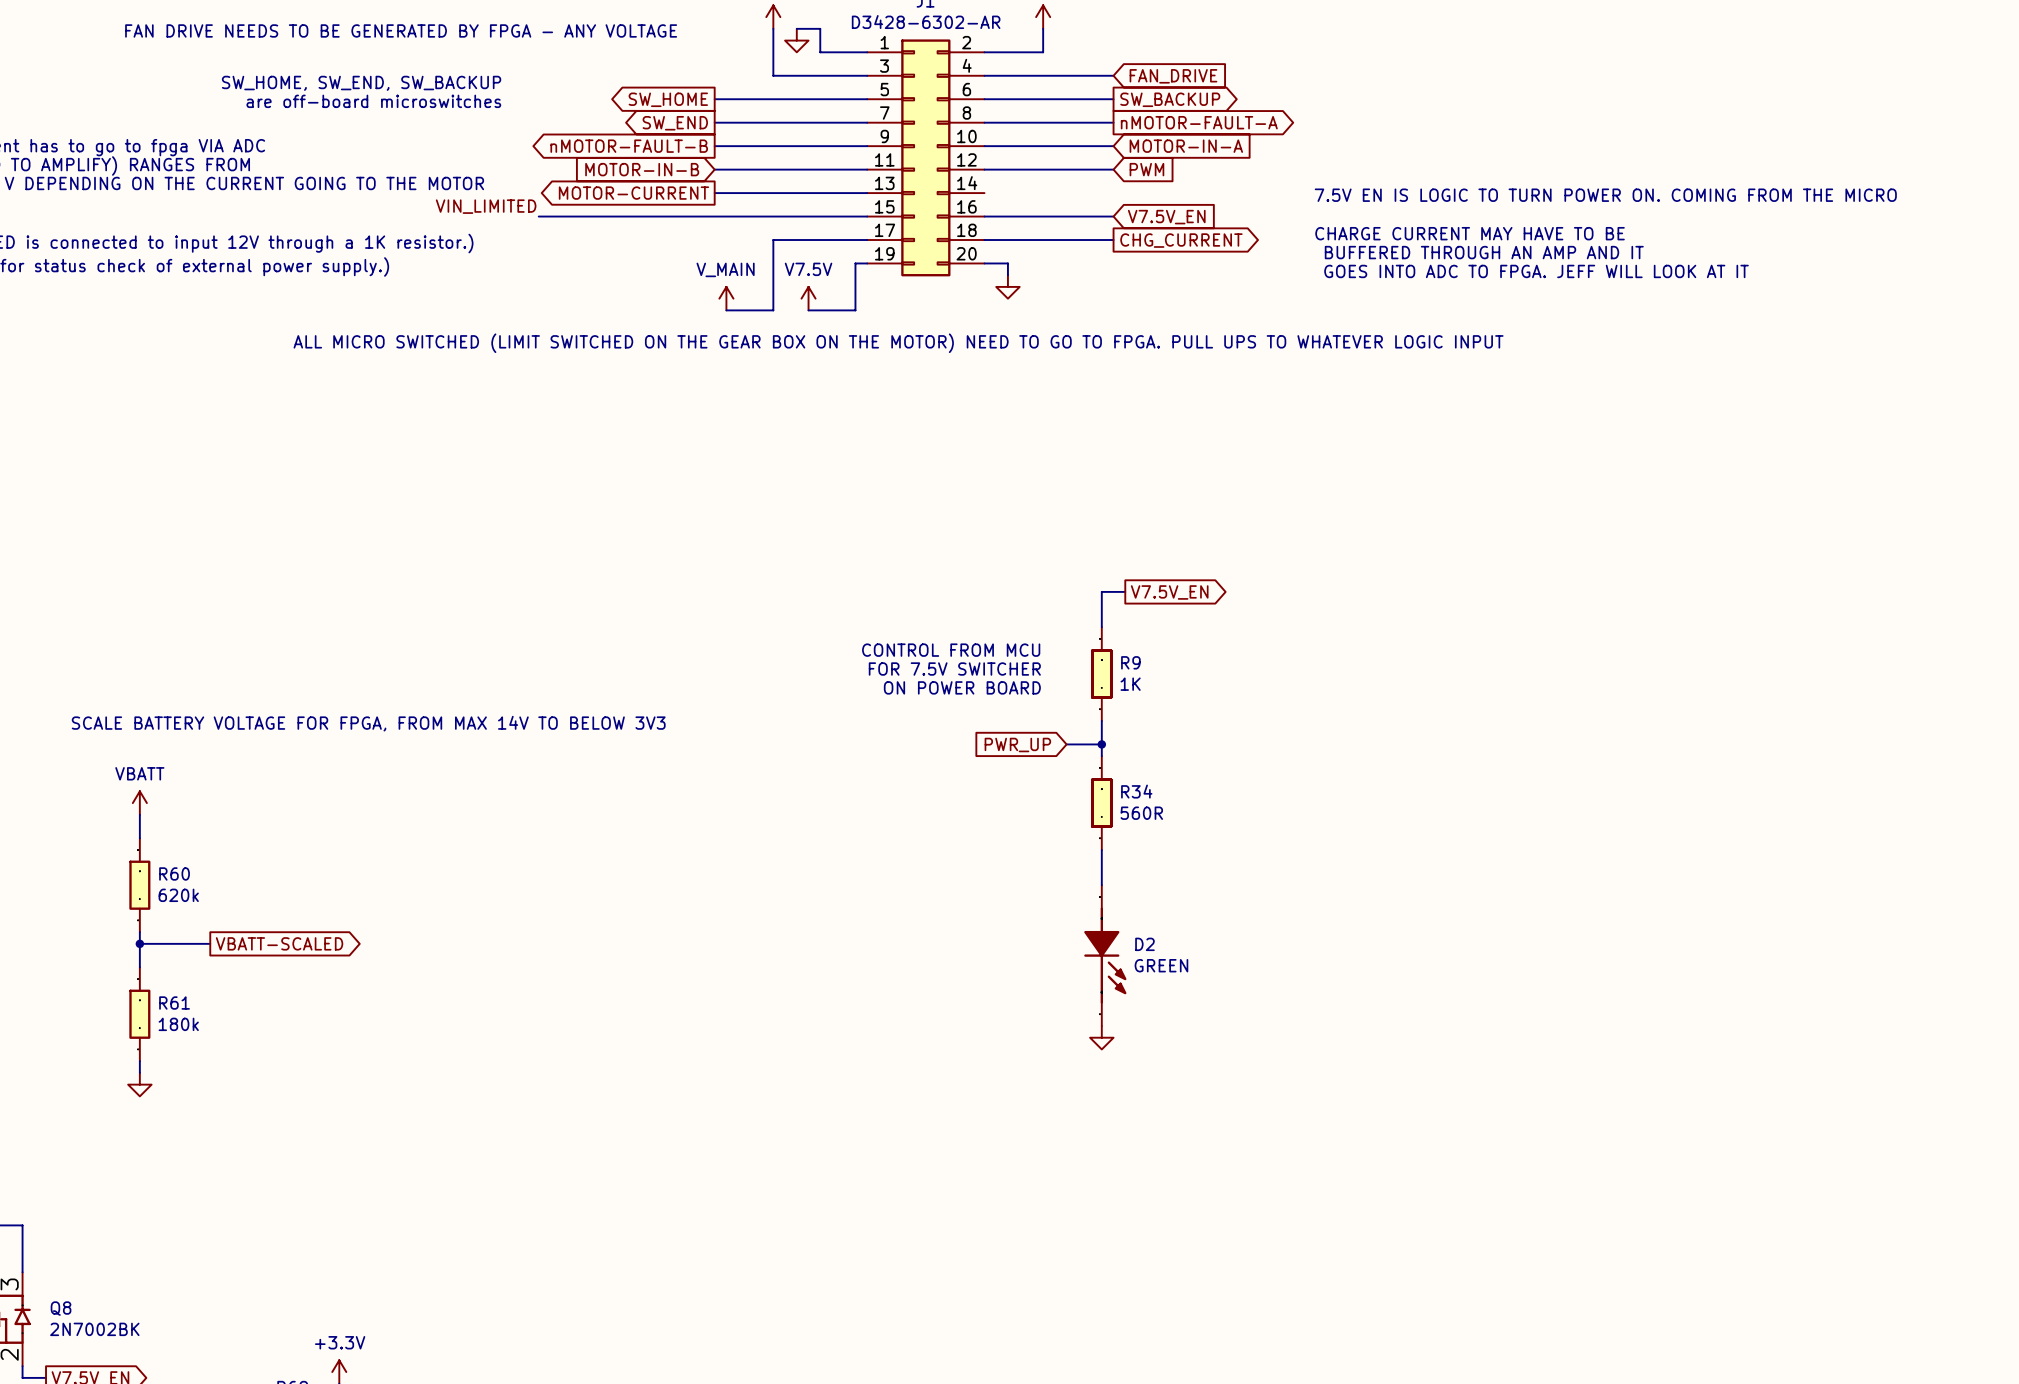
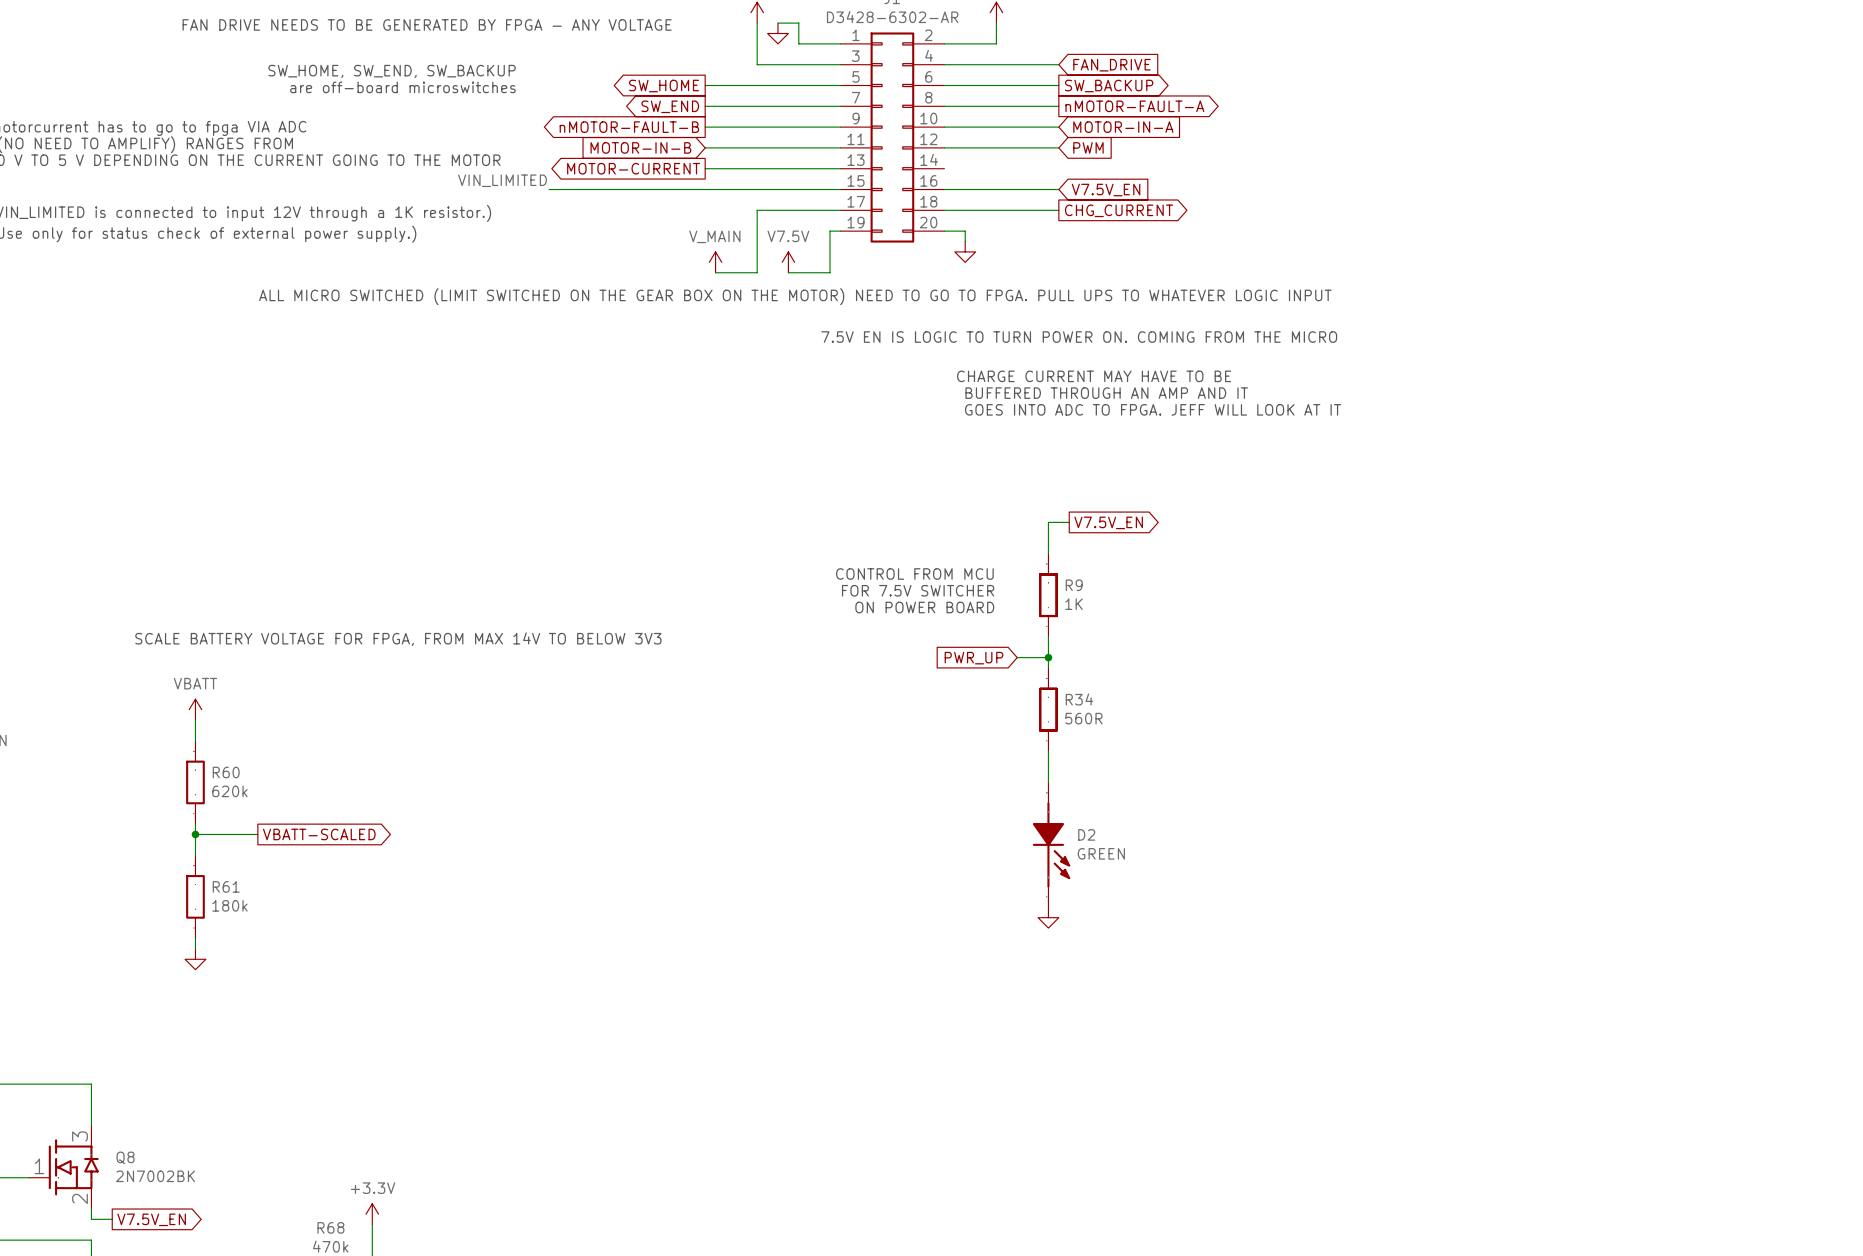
text: 7.5V EN IS LOGIC TO TURN POWER ON. COMING FROM THE MICRO (1605, 195) -> none
text: CHARGE CURRENT MAY HAVE TO BE (1470, 233) -> none
text: BUFFERED THROUGH AN AMP AND IT (1484, 252) -> none
text: GOES INTO ADC TO FPGA. JEFF WILL LOOK AT IT (1536, 271) -> none
text position: ALL MICRO SWITCHED (LIMIT SWITCHED ON THE GEAR BOX ON THE MOTOR) NEED TO GO TO FPGA. PULL UPS TO WHATEVER LOGIC INPUT (898, 343) -> ALL MICRO SWITCHED (LIMIT SWITCHED ON THE GEAR BOX ON THE MOTOR) NEED TO GO TO FPGA. PULL UPS TO WHATEVER LOGIC INPUT (795, 296)
text: none -> 7.5V EN IS LOGIC TO TURN POWER ON. COMING FROM THE MICRO (1079, 337)
text: none -> CHARGE CURRENT MAY HAVE TO BE (1094, 376)
text: none -> BUFFERED THROUGH AN AMP AND IT (1106, 393)
text: none -> GOES INTO ADC TO FPGA. JEFF WILL LOOK AT IT (1153, 409)

